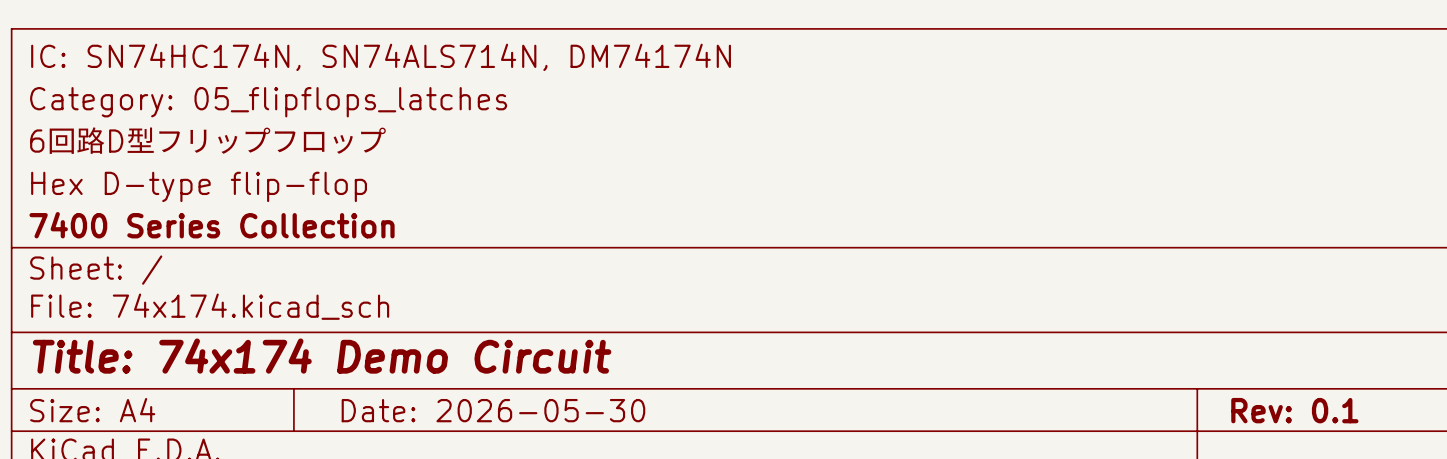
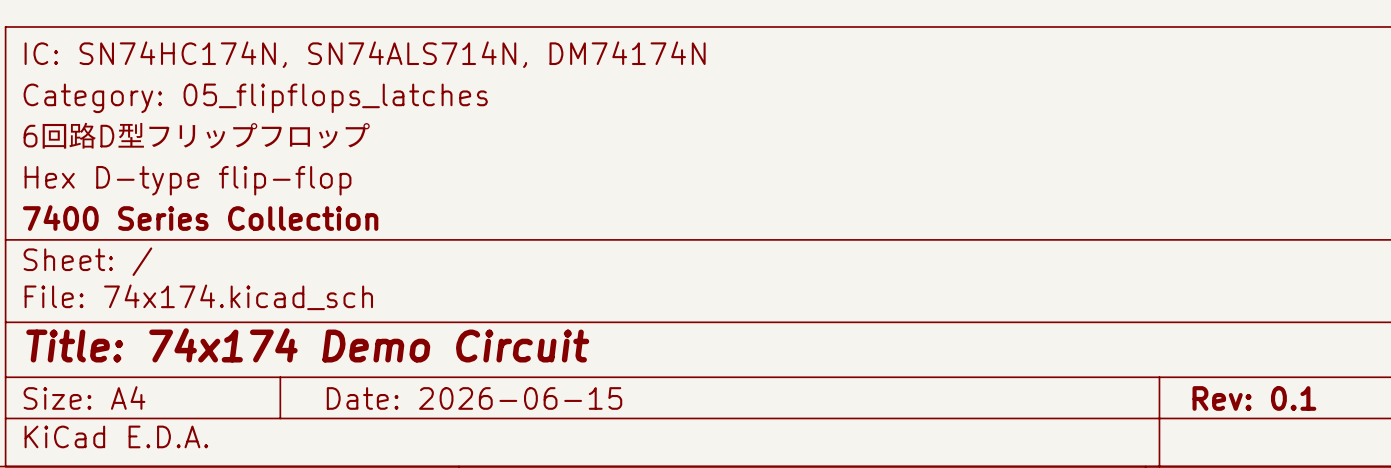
title block: Date: 2026-05-30 (493, 410) -> Date: 2026-06-15 (474, 398)

